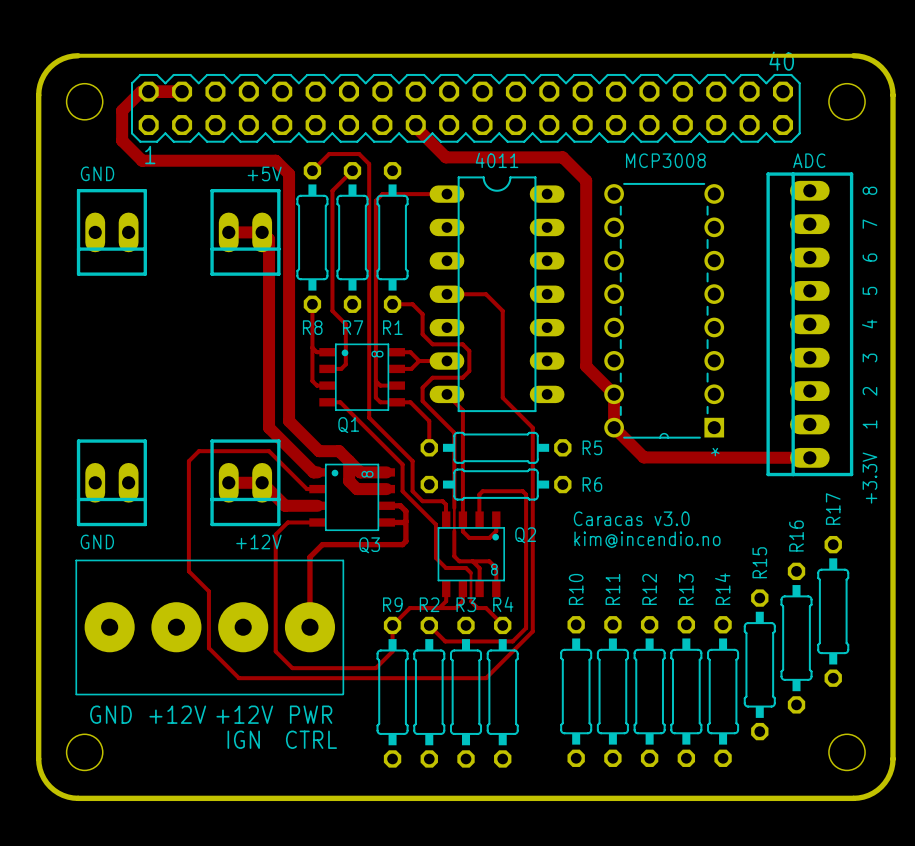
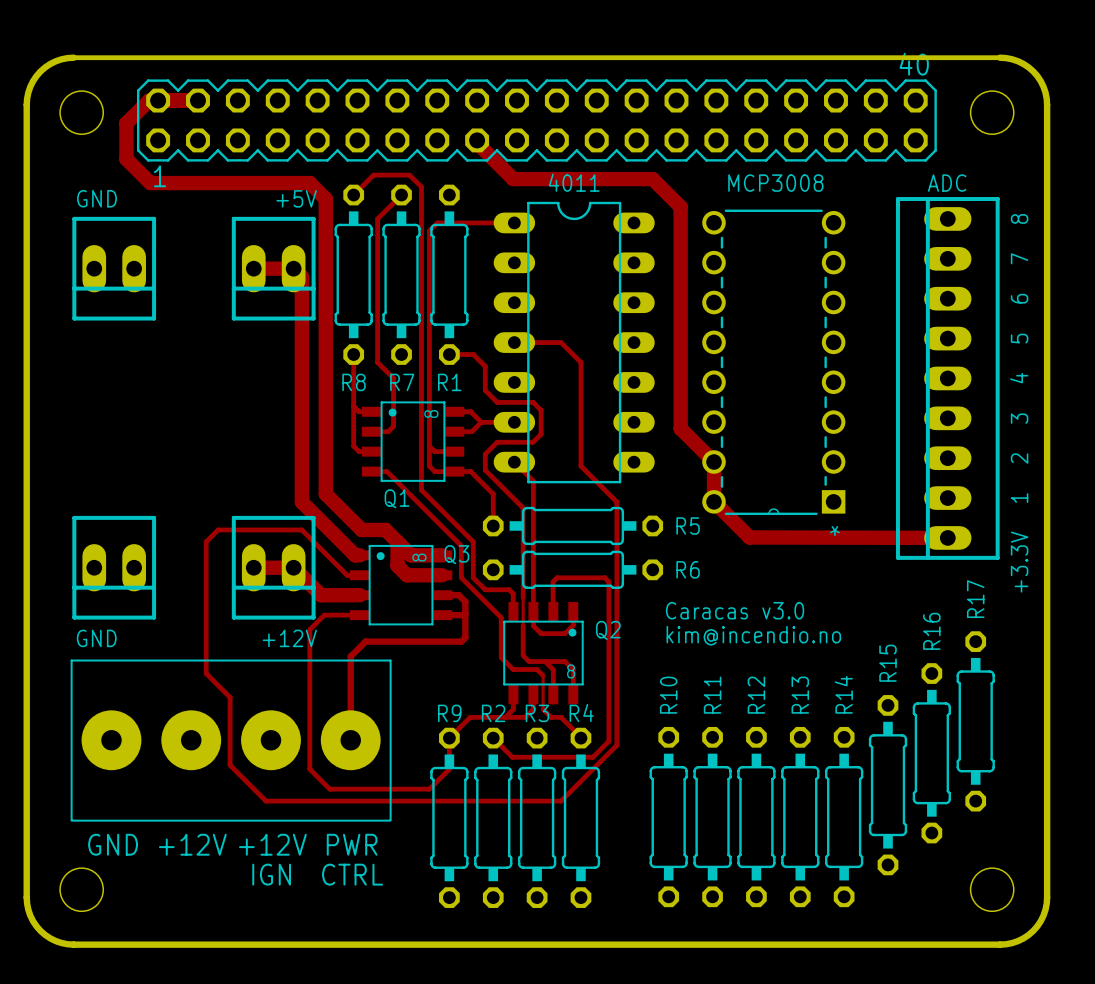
Q3 name position: Q3 (369, 545) -> Q3 (456, 554)

